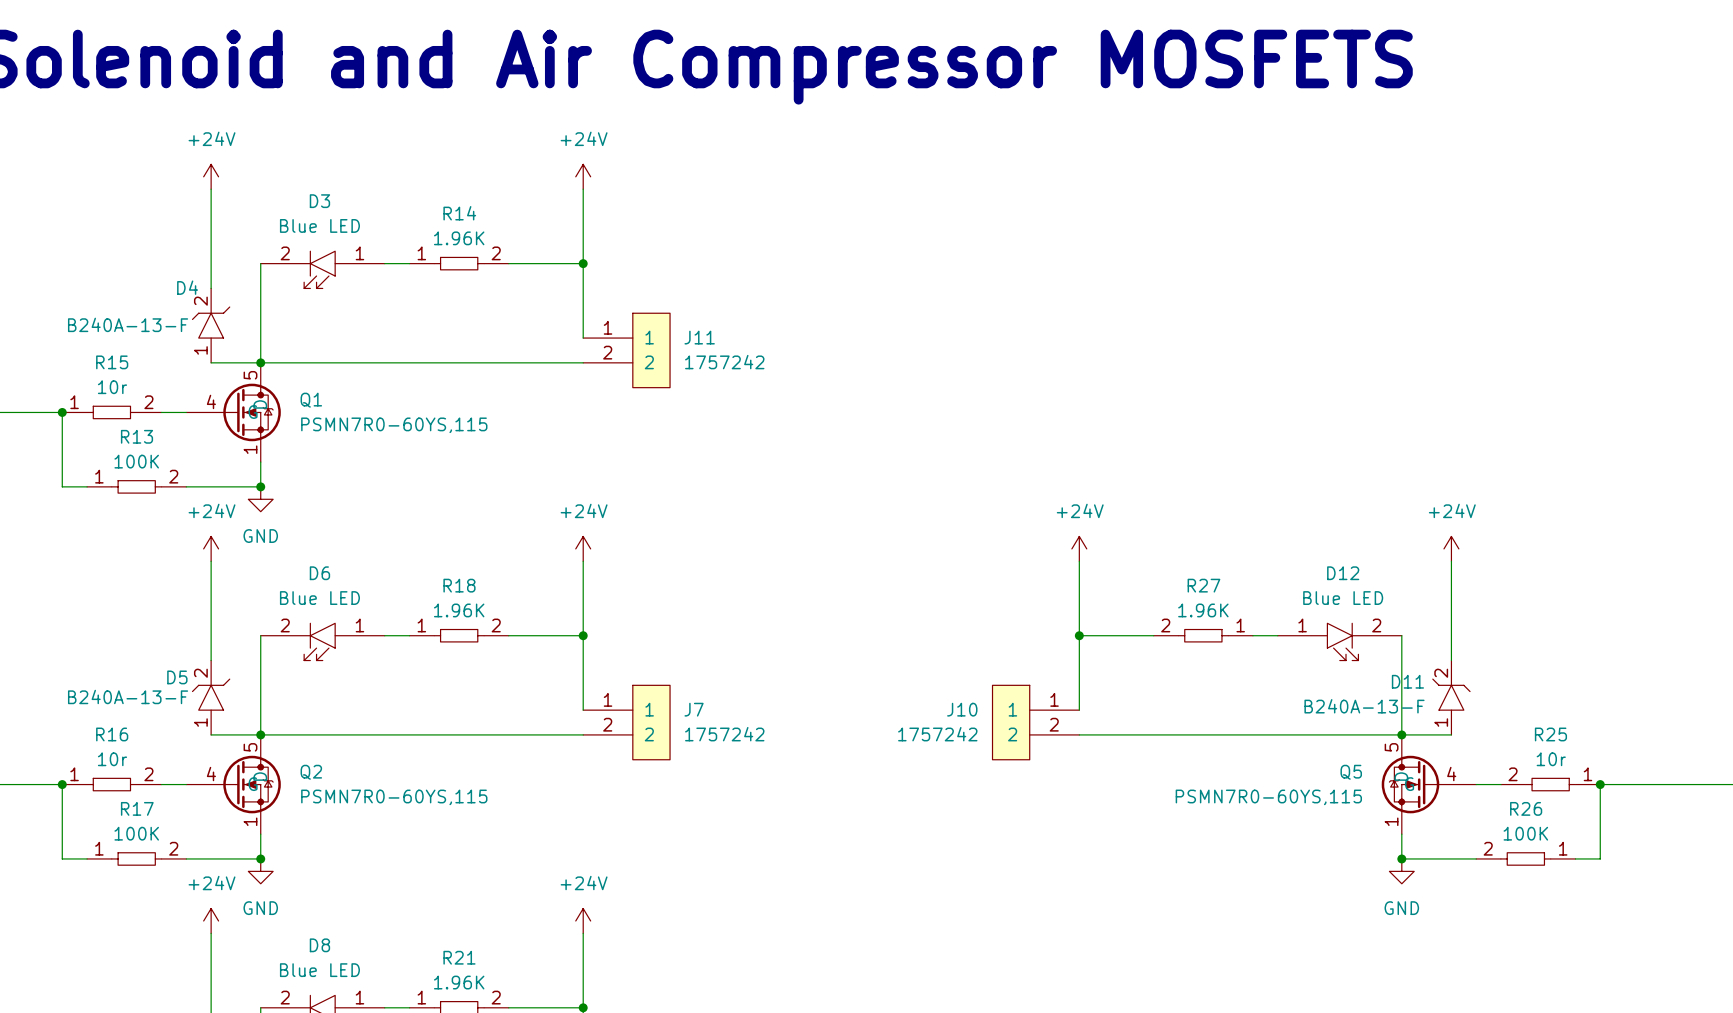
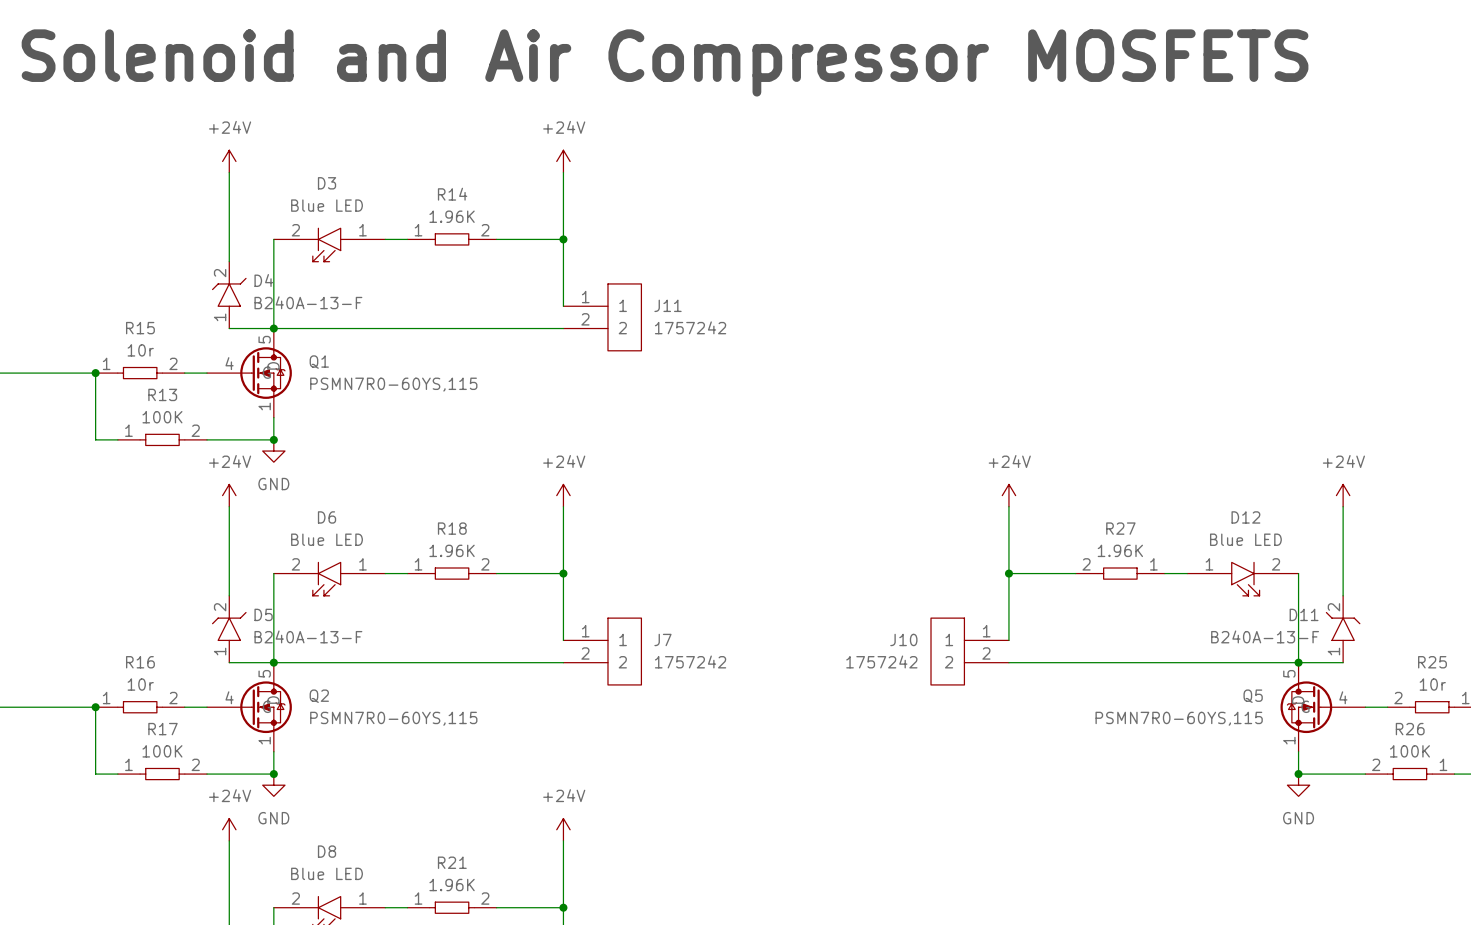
D4 name position: D4 (187, 287) -> D4 (263, 280)
D4 text position: B240A-13-F (128, 324) -> B240A-13-F (308, 302)
D5 name position: D5 (177, 677) -> D5 (263, 614)
D5 text position: B240A-13-F (128, 696) -> B240A-13-F (308, 636)

